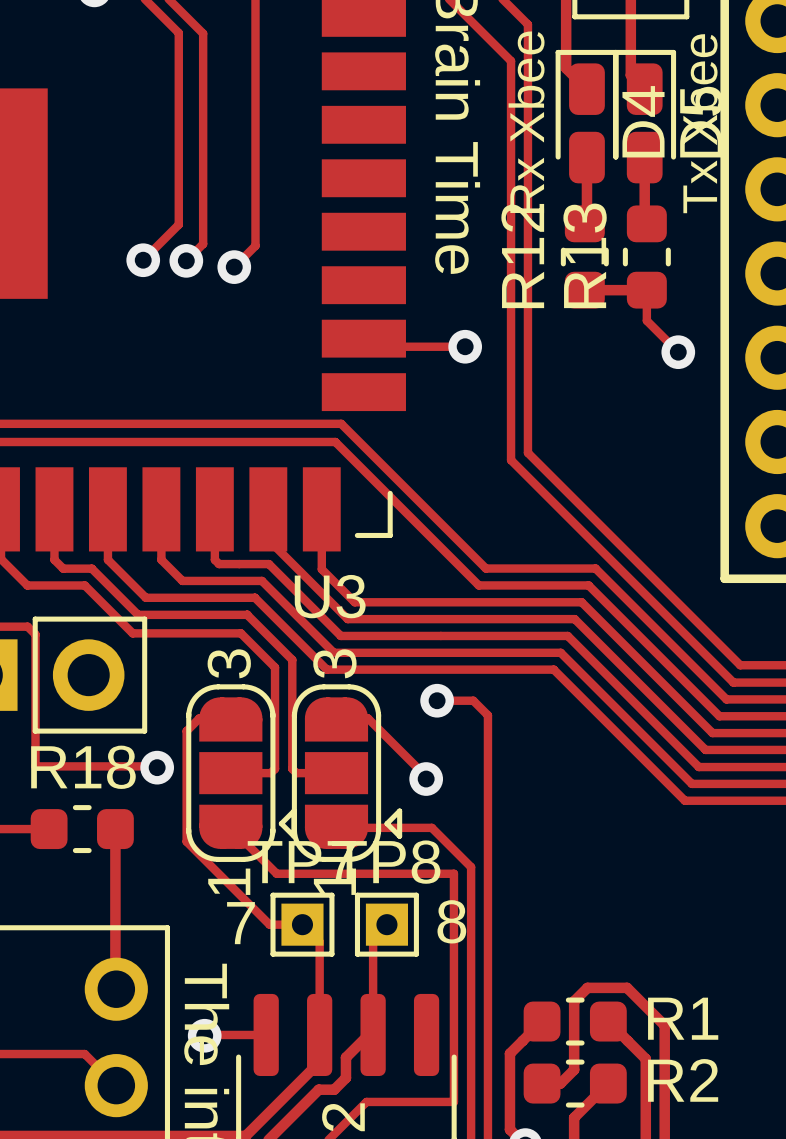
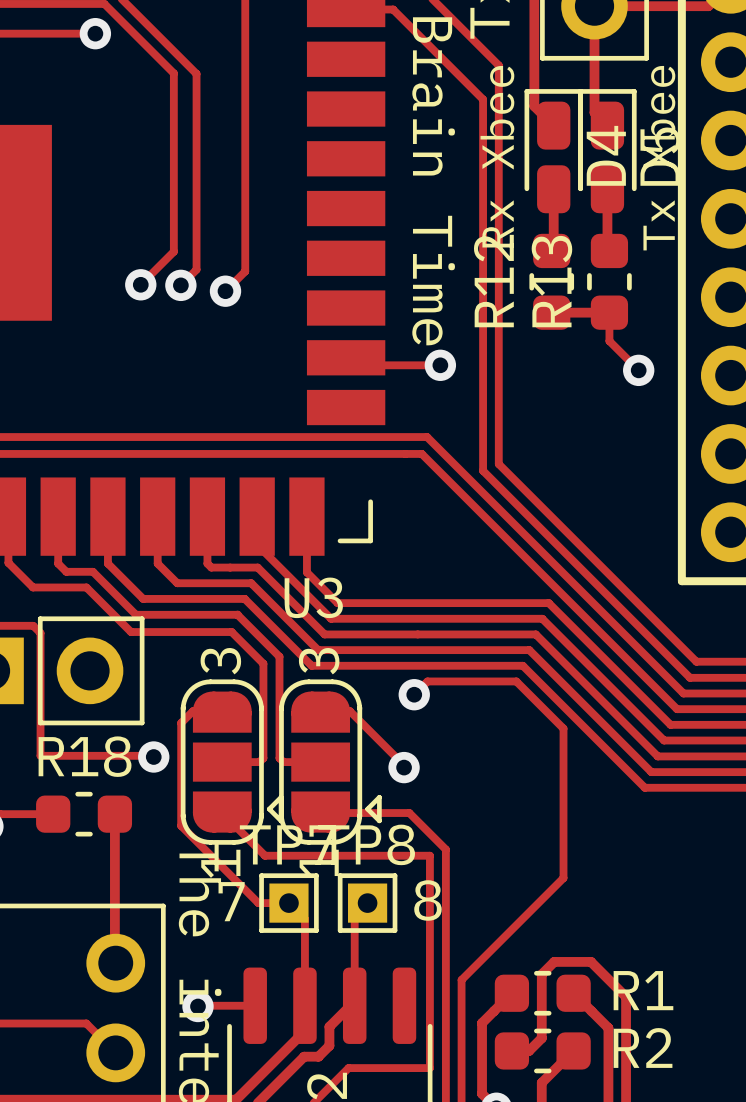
track: (341, 423) (485, 568) (595, 568) -> (325, 437) (427, 437) (561, 571)
track: (335, 442) (478, 585) (588, 585) -> (319, 453) (421, 453) (555, 587)
track: (437, 700) (473, 700) (487, 715) (487, 1007) -> (414, 694) (427, 681) (516, 681) (563, 728) (563, 878) (461, 980)

